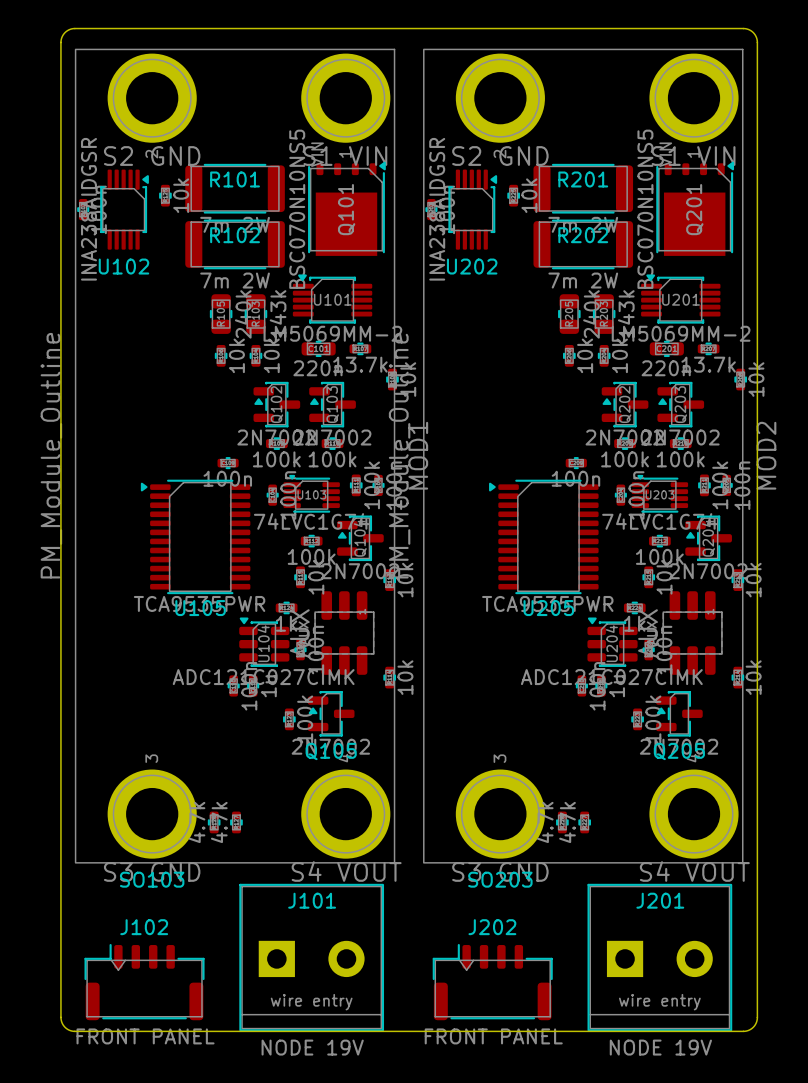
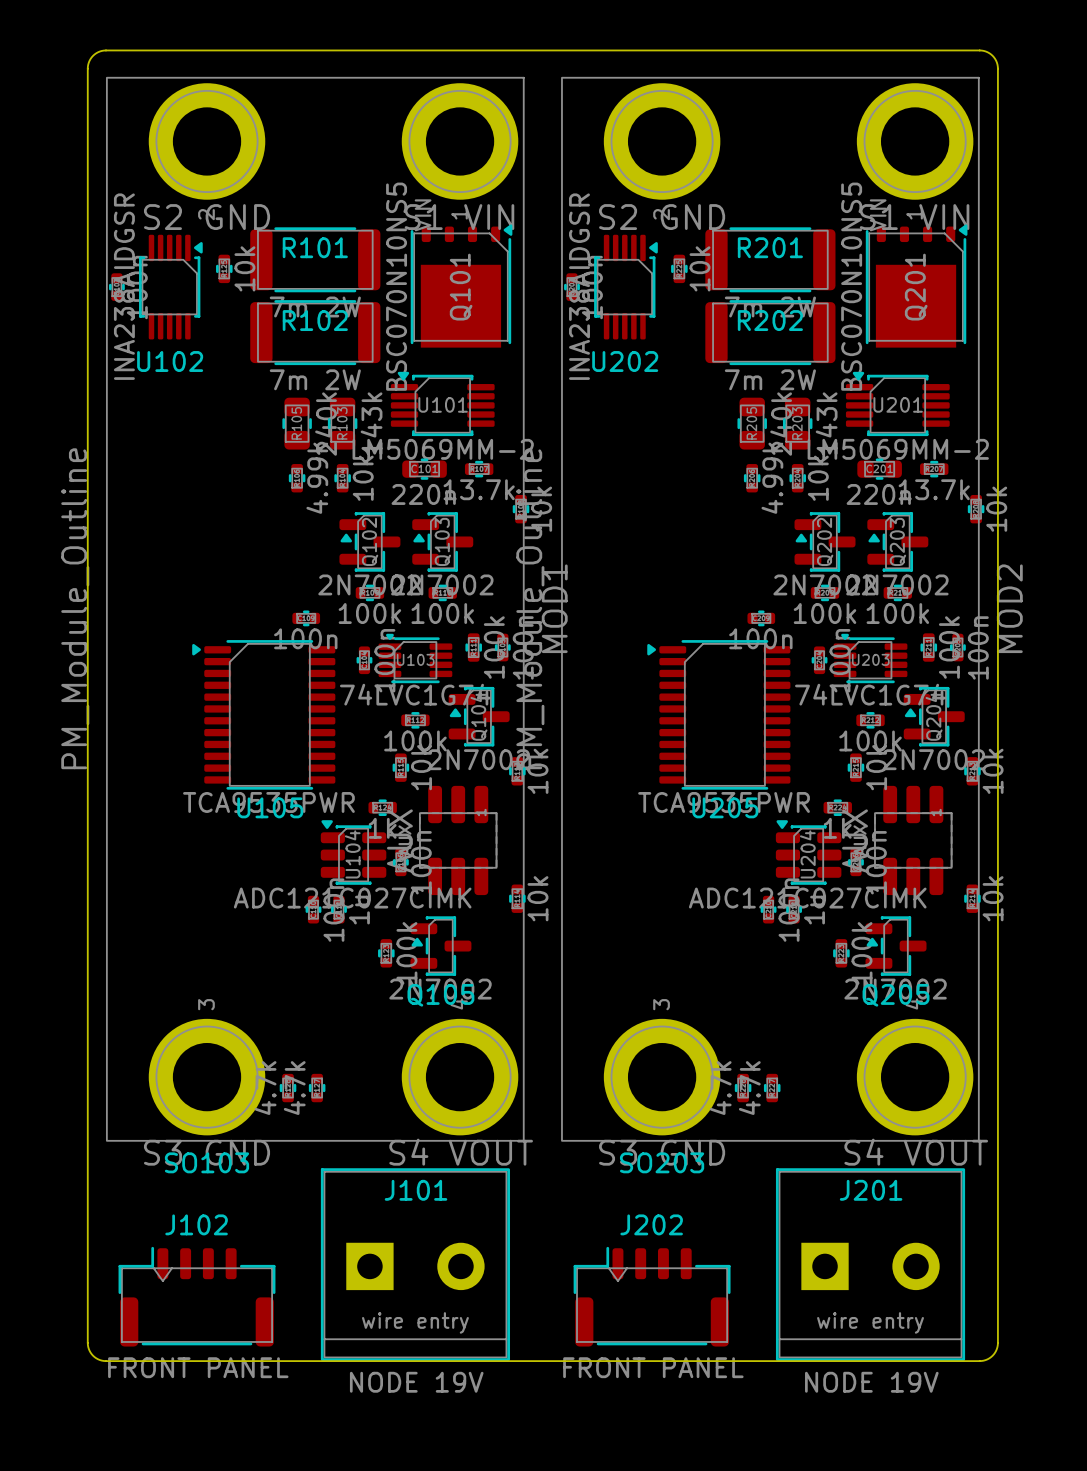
part value: 10k (236, 355) -> 4.99k (317, 478)
part value: 10k (585, 355) -> 4.99k (772, 478)

